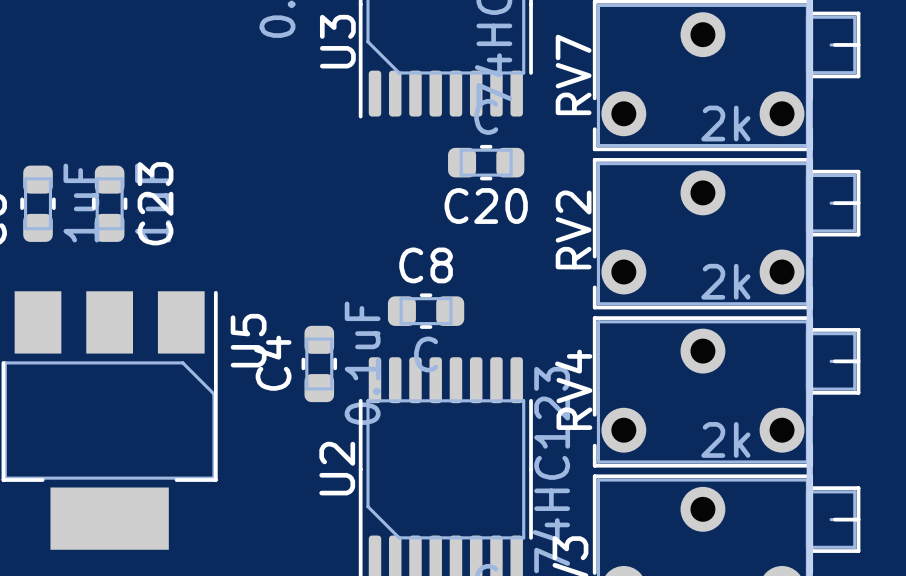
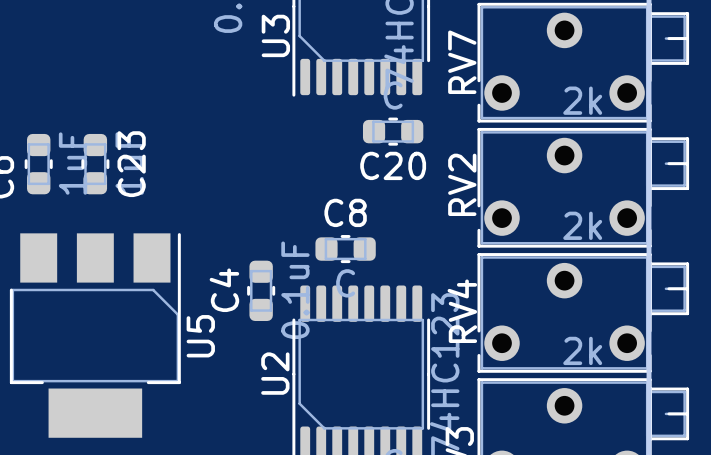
U5 name position: U5 (248, 340) -> U5 (200, 336)

